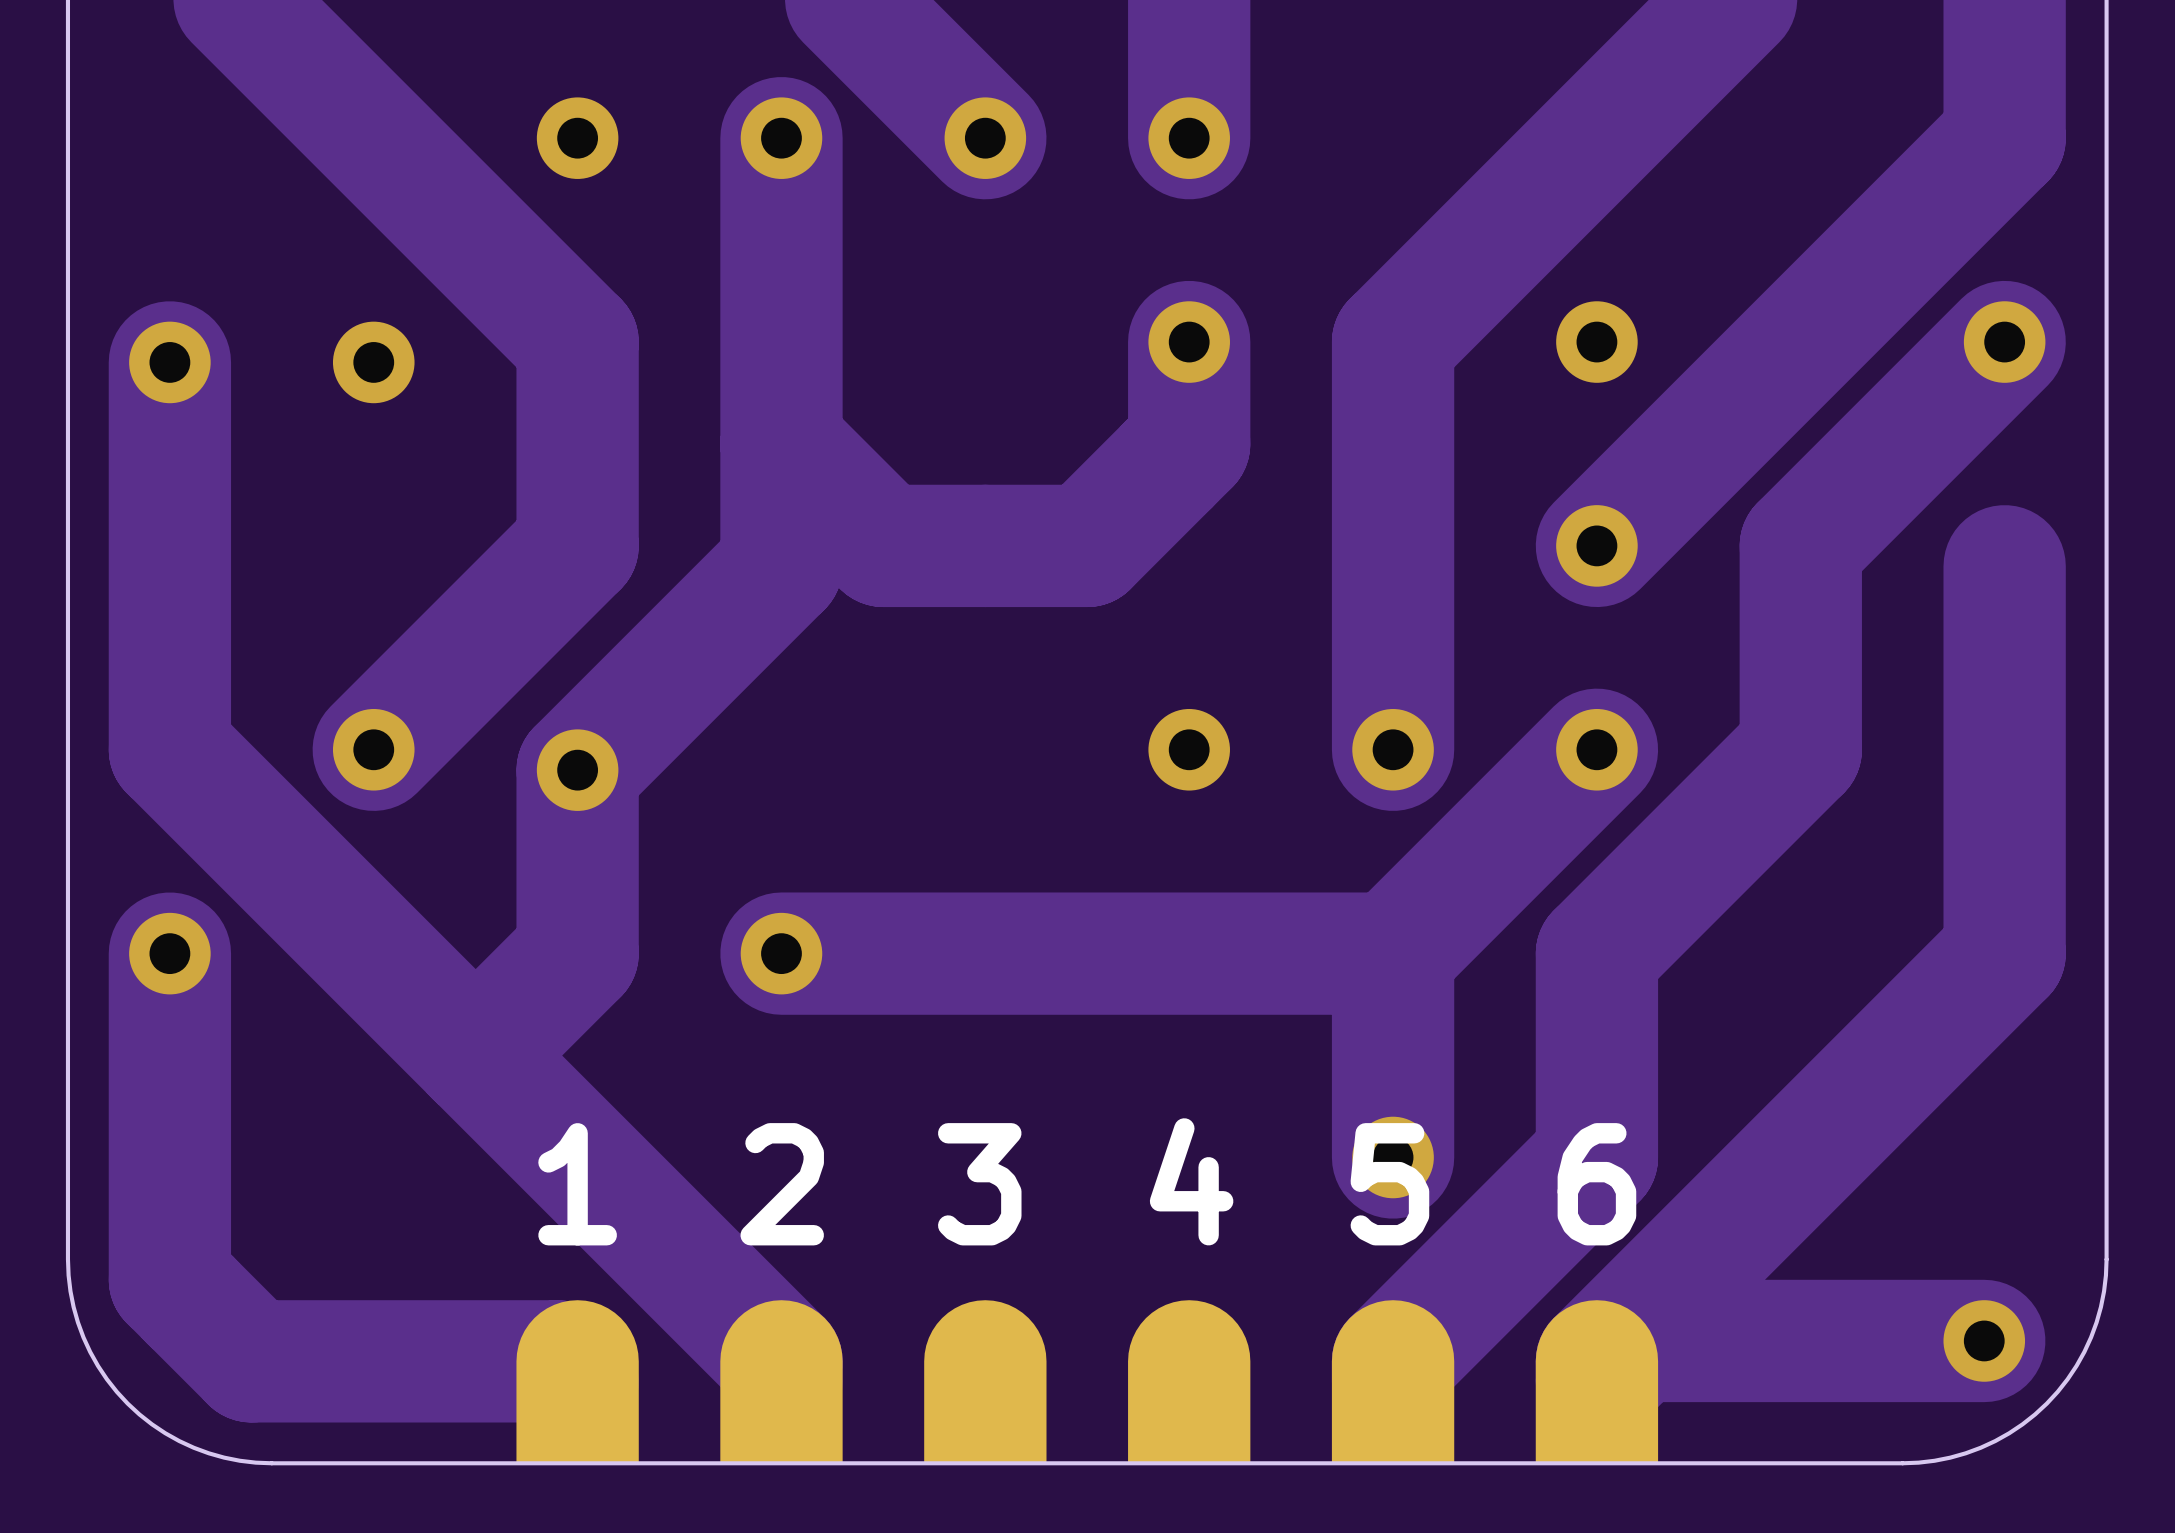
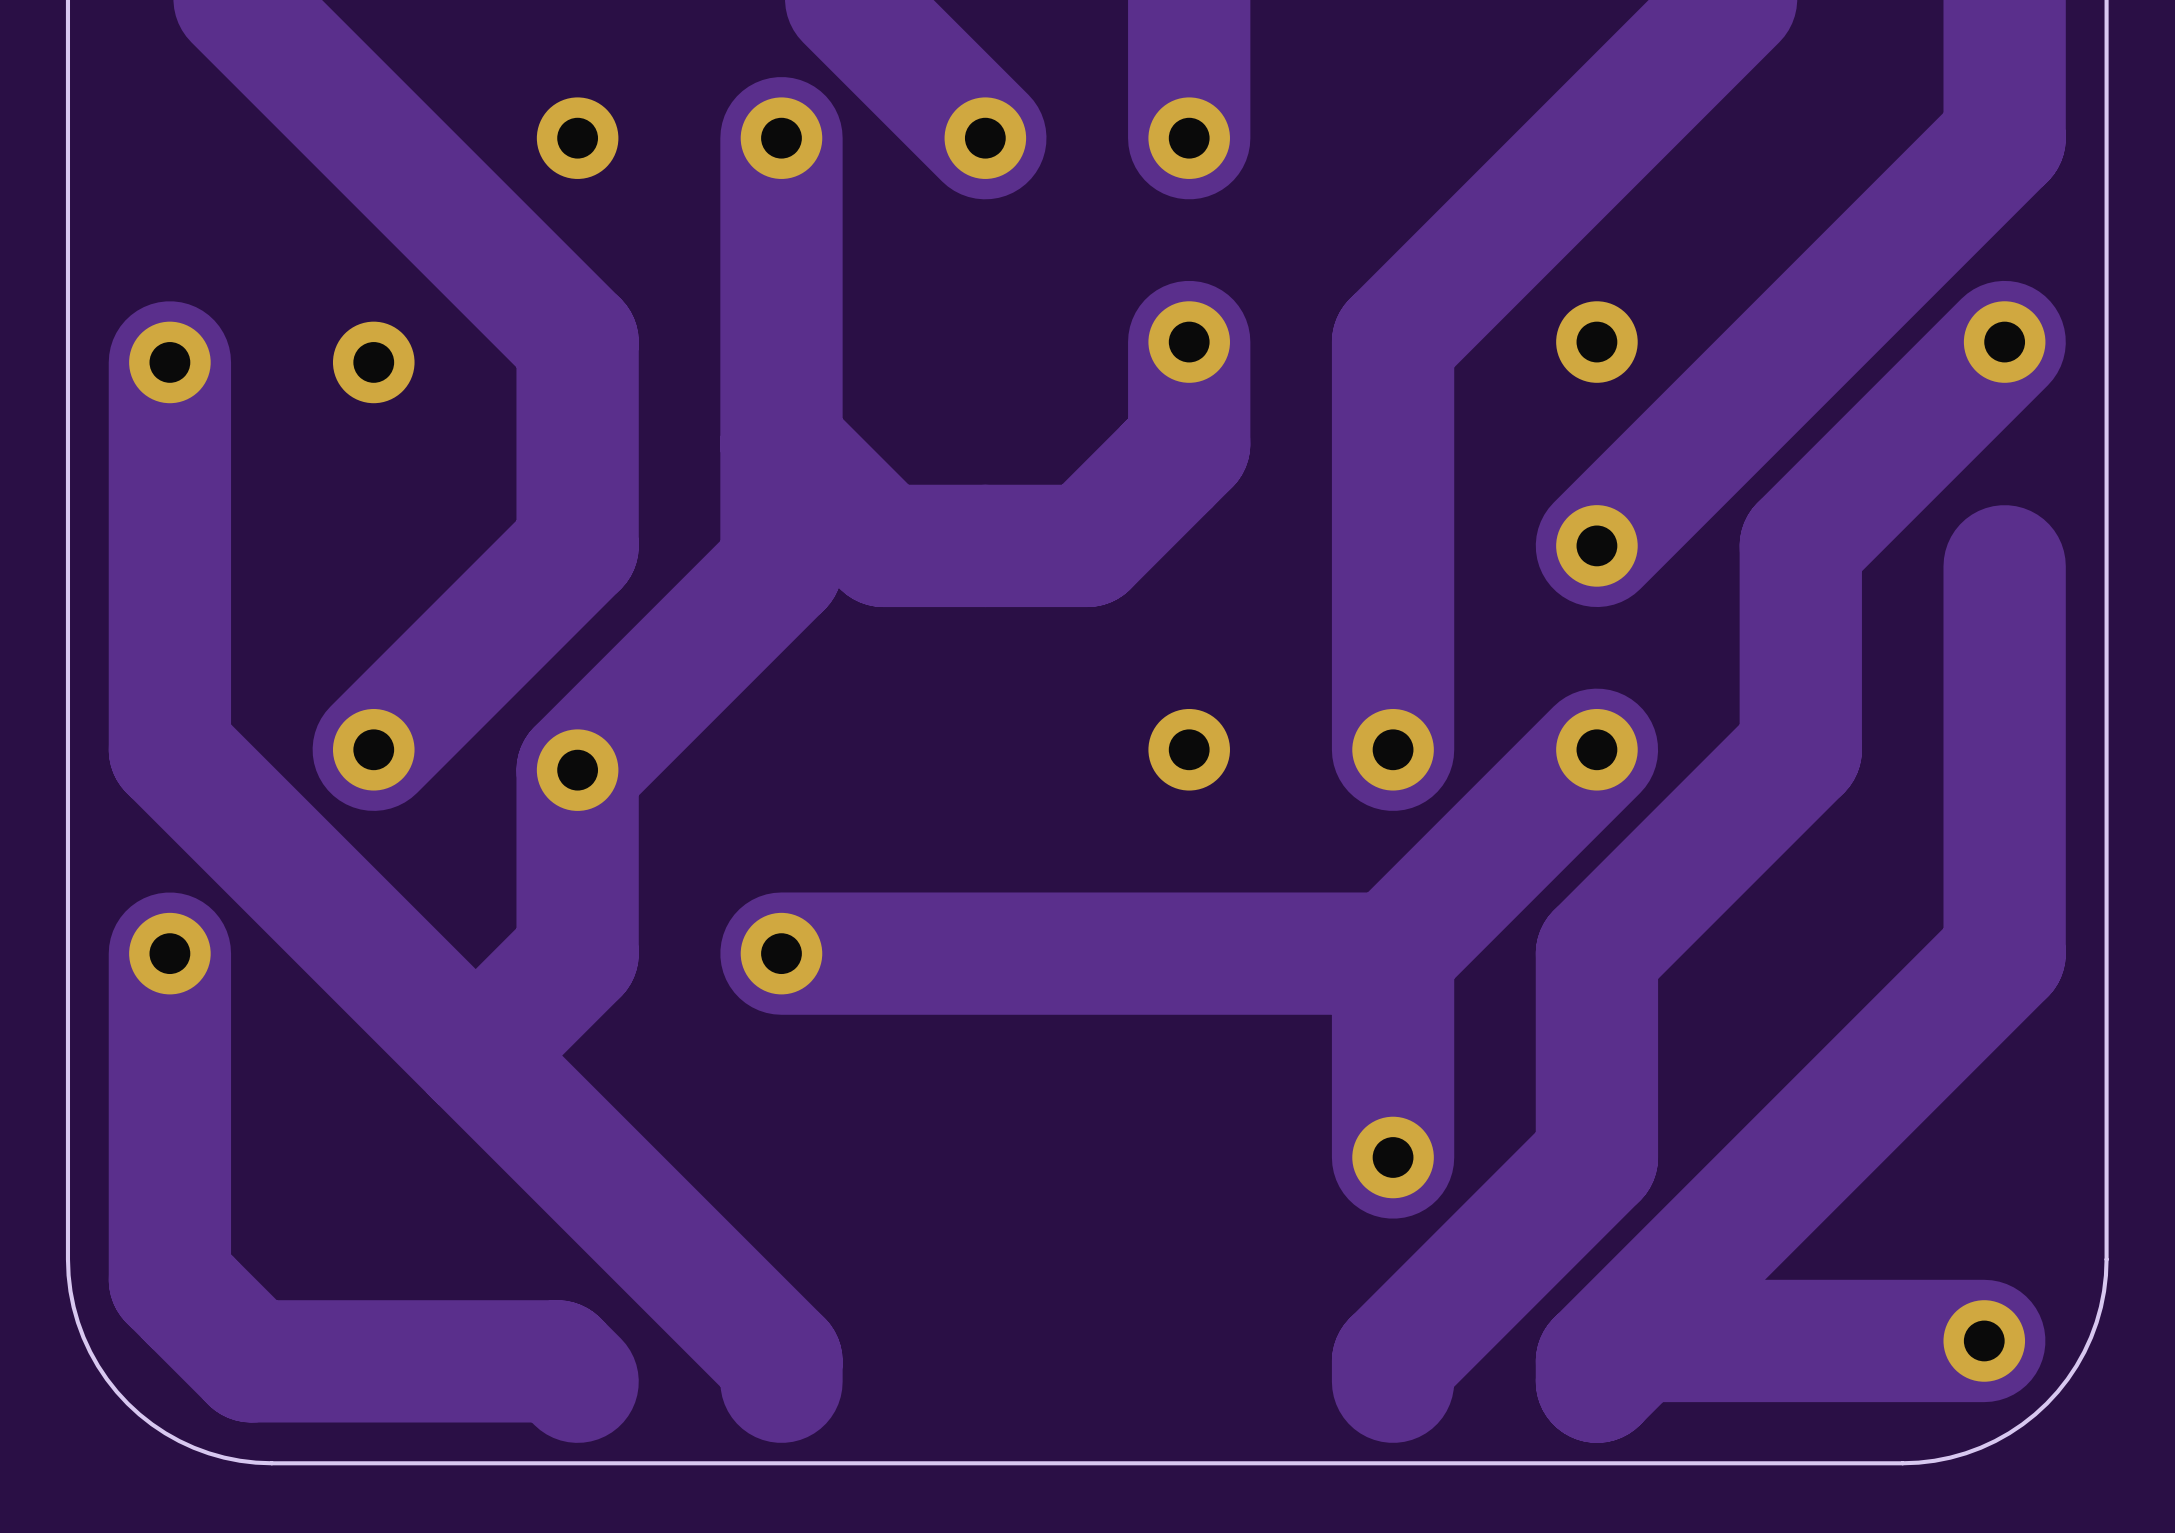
text: 4 (1191, 1181) -> none
text: 1 (577, 1184) -> none
text: 2 (782, 1184) -> none
text: 3 (979, 1184) -> none
text: 5 (1389, 1184) -> none
text: 6 (1596, 1184) -> none
part: (577, 1381) -> none
part: (781, 1381) -> none
part: (985, 1381) -> none
part: (1189, 1381) -> none
part: (1393, 1381) -> none
part: (1596, 1381) -> none

